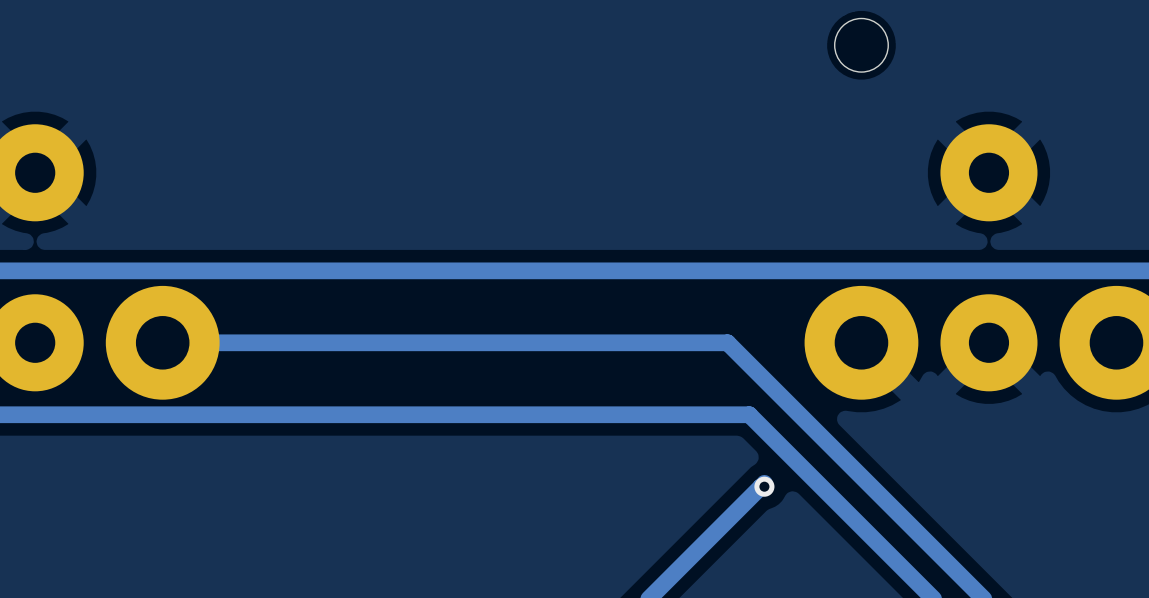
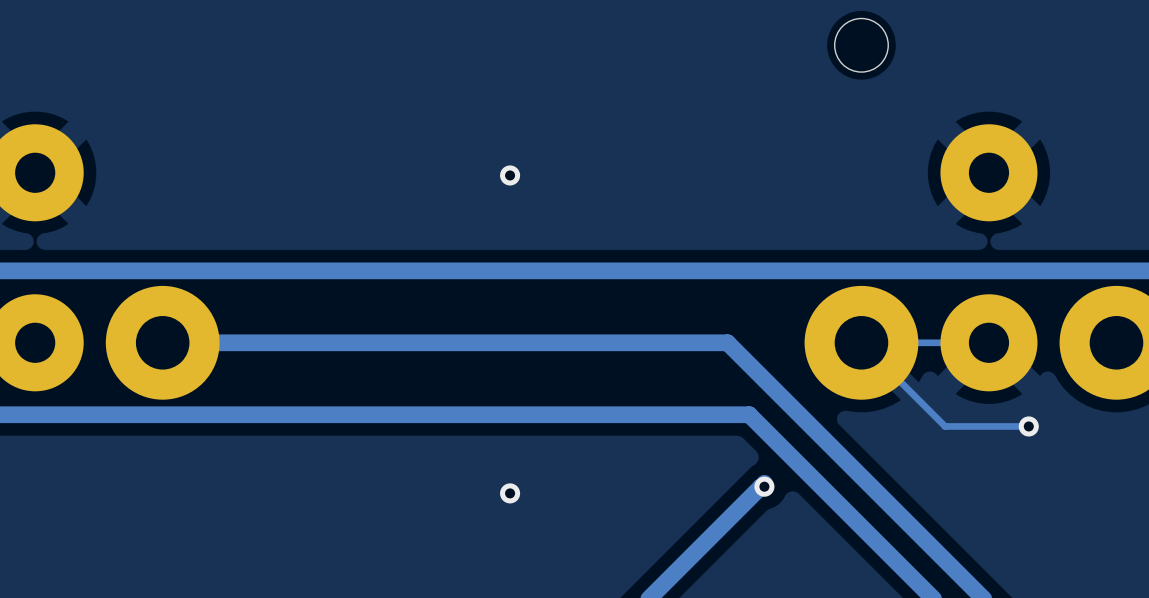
via: none -> (510, 175)
track: none -> (988, 342) (861, 342) (945, 426) (1028, 426)
via: none -> (1028, 426)
via: none -> (510, 493)

